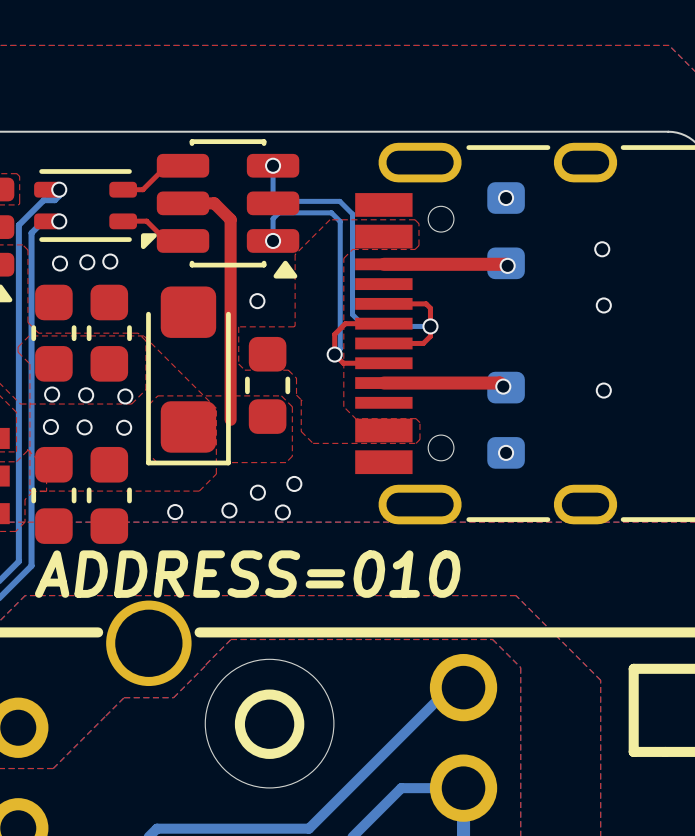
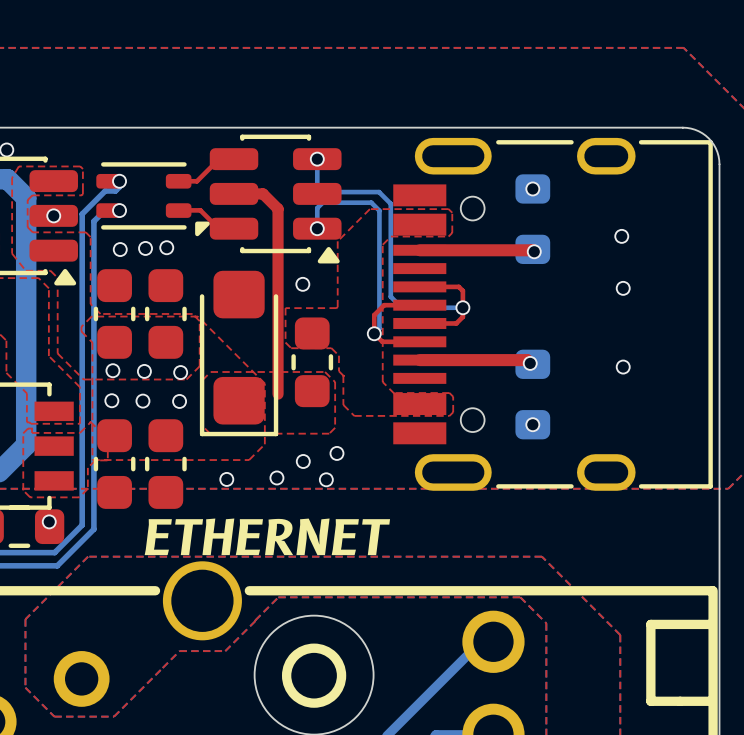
text: none -> ETHERNET (267, 536)
text: ADDRESS=010 (247, 574) -> none

